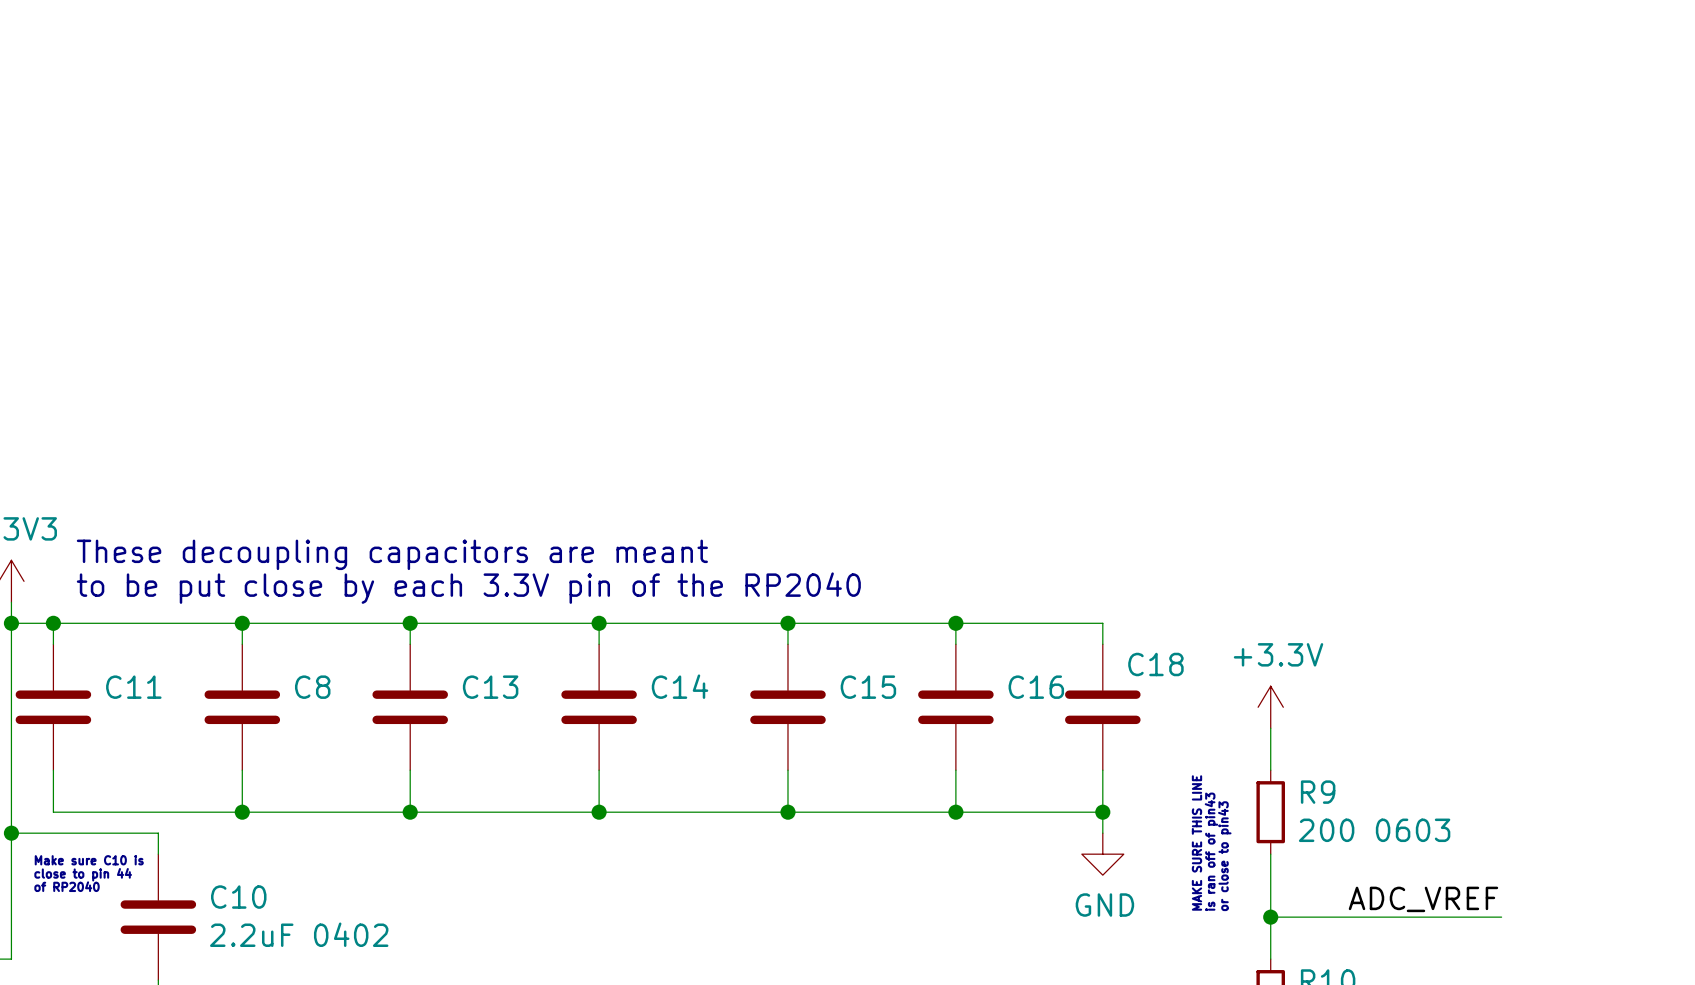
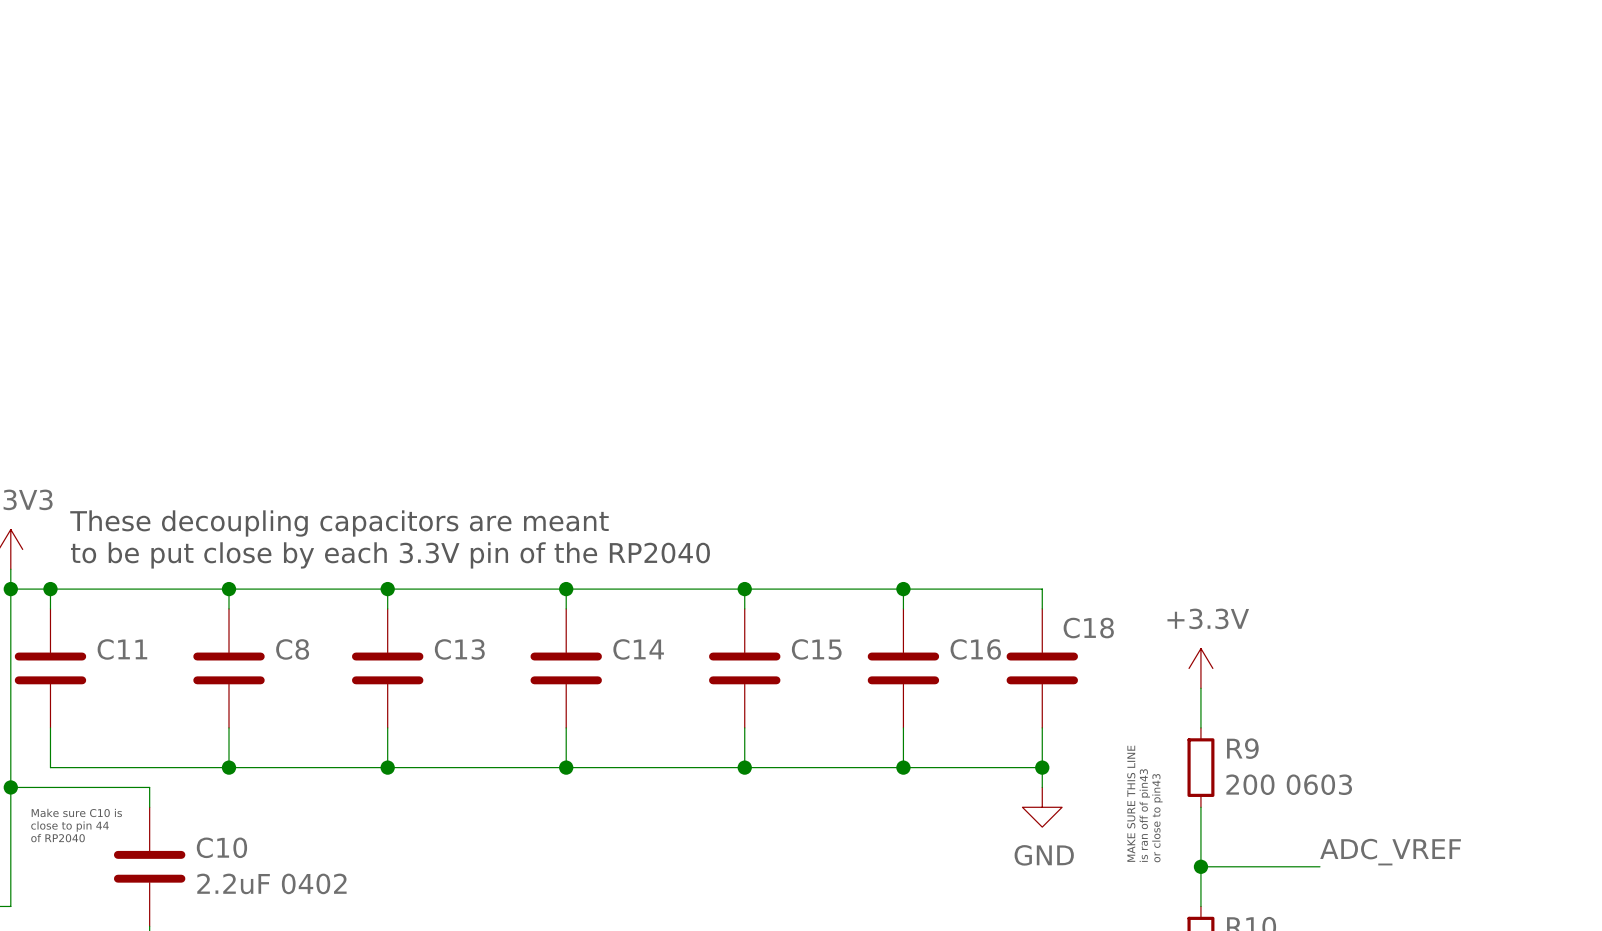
label position: ADC_VREF (1423, 899) -> ADC_VREF (1390, 852)
wire: (1396, 917) (1501, 917) -> none

